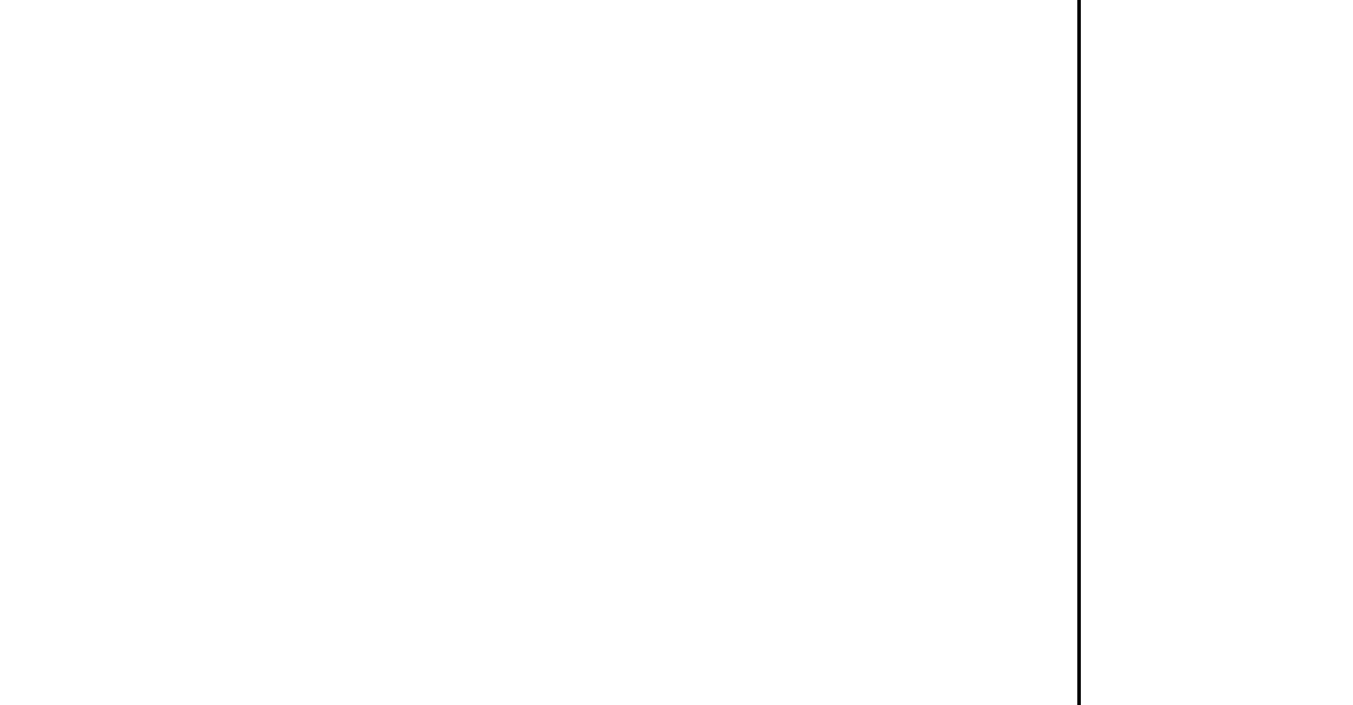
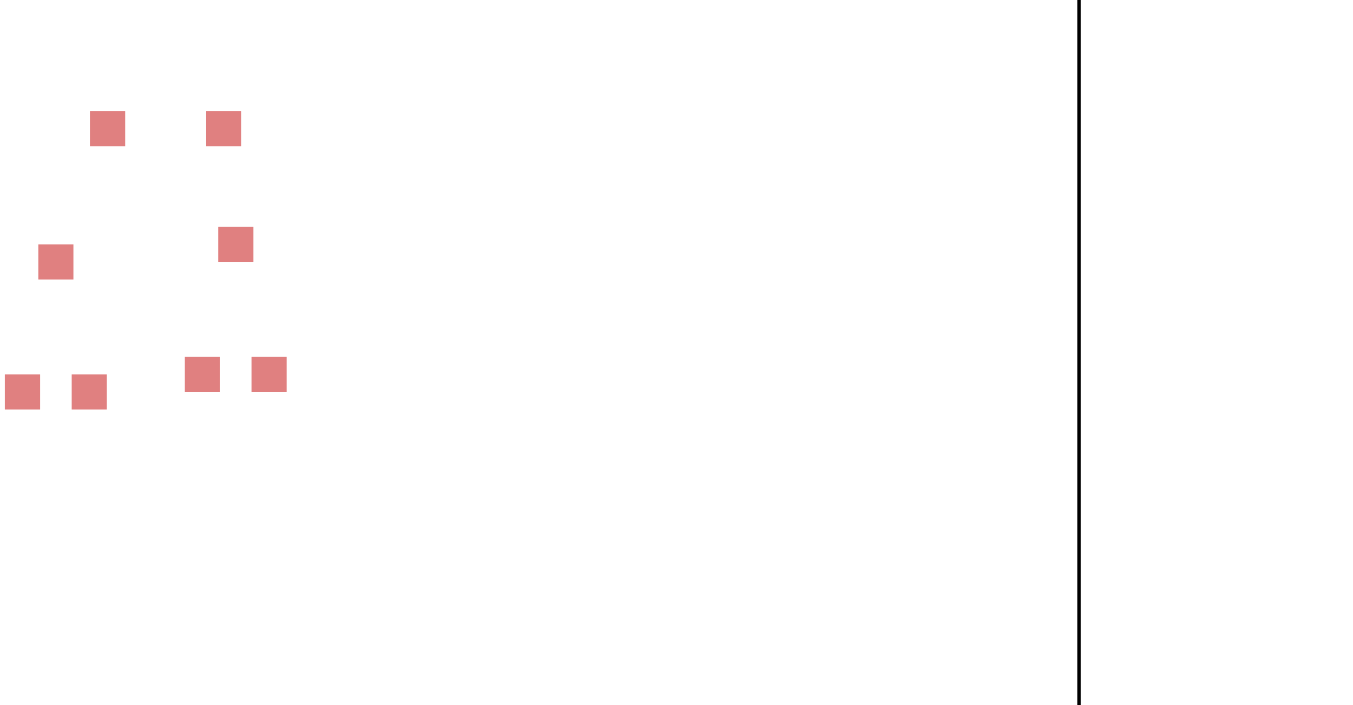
part: none -> (165, 128)
part: none -> (235, 309)
part: none -> (55, 326)

